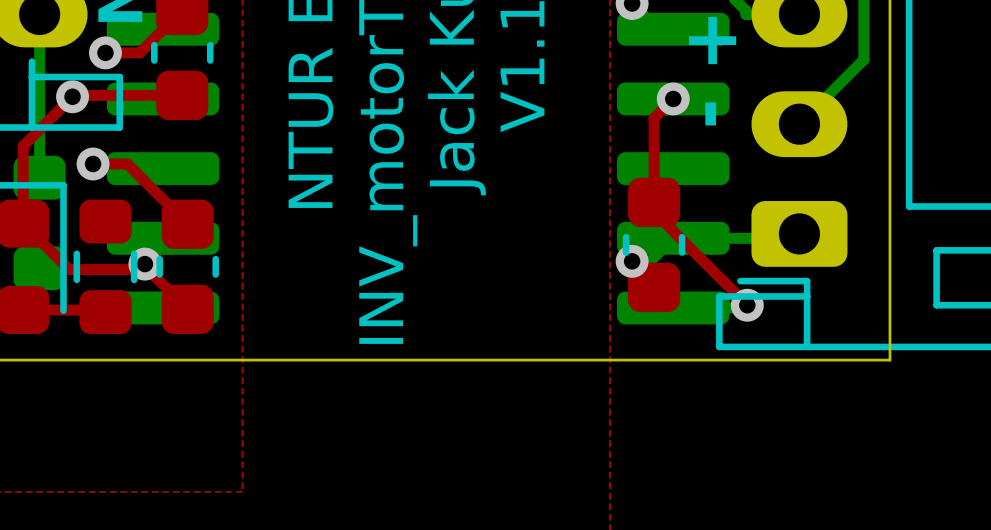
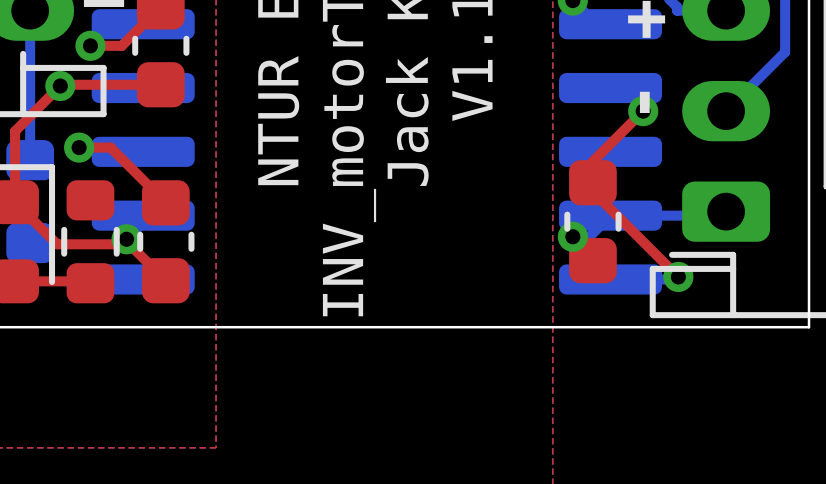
top track: (673, 98) (654, 118) (654, 179) -> (643, 111) (592, 161)
via position: (673, 98) -> (643, 111)

